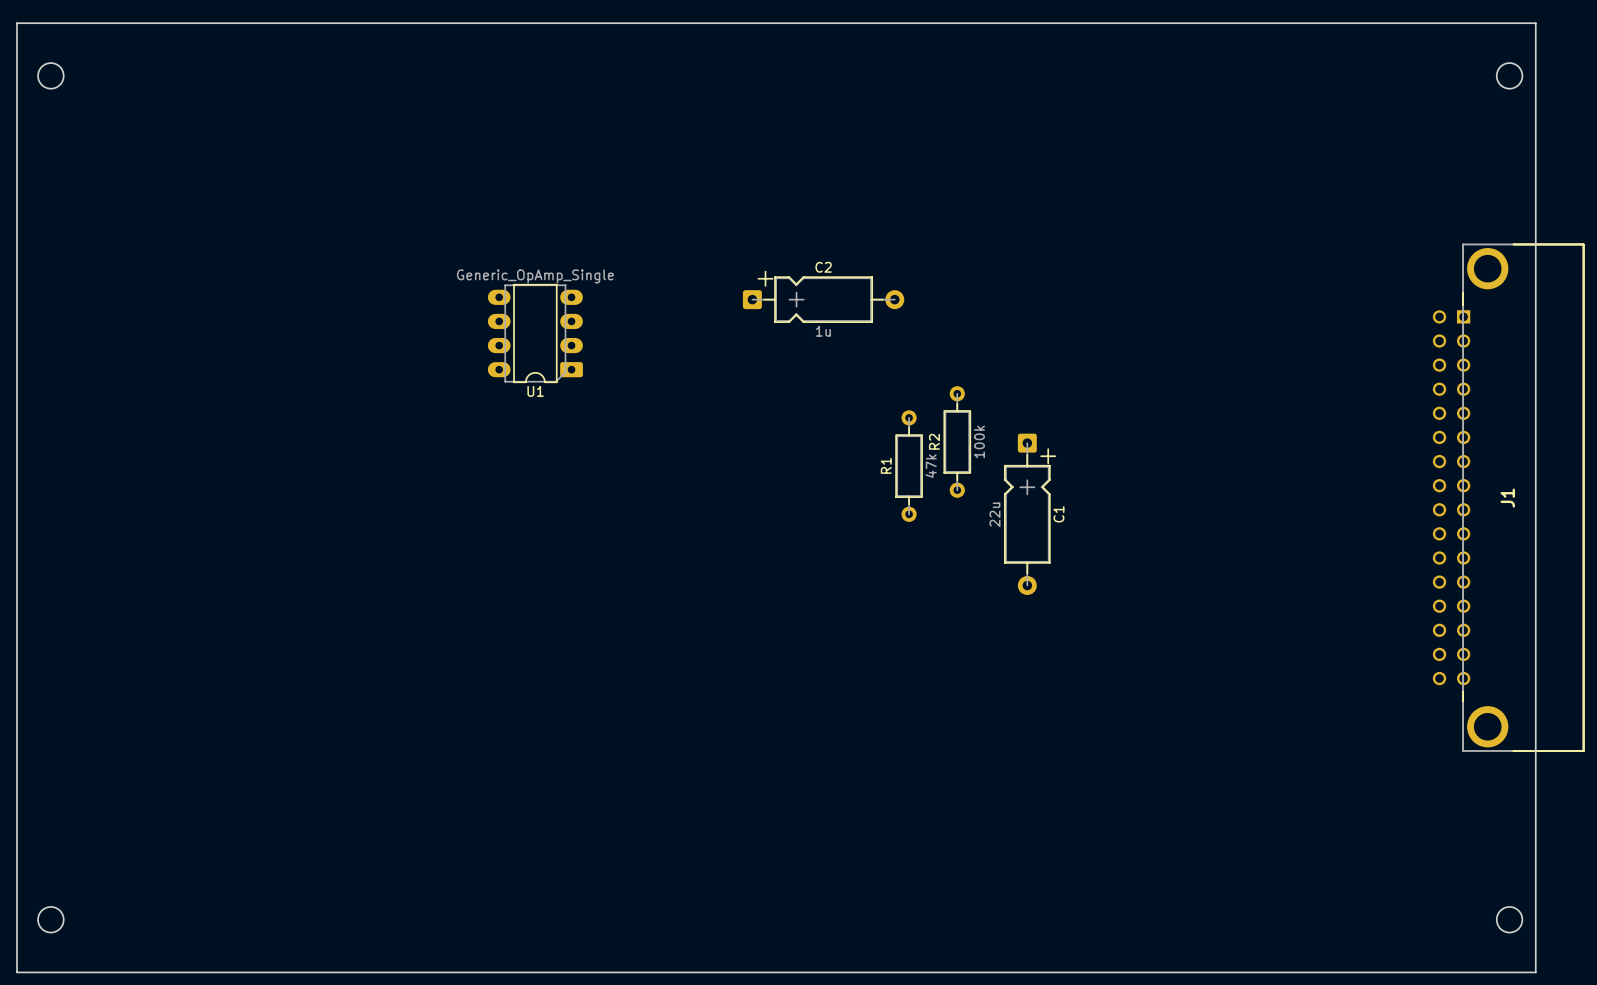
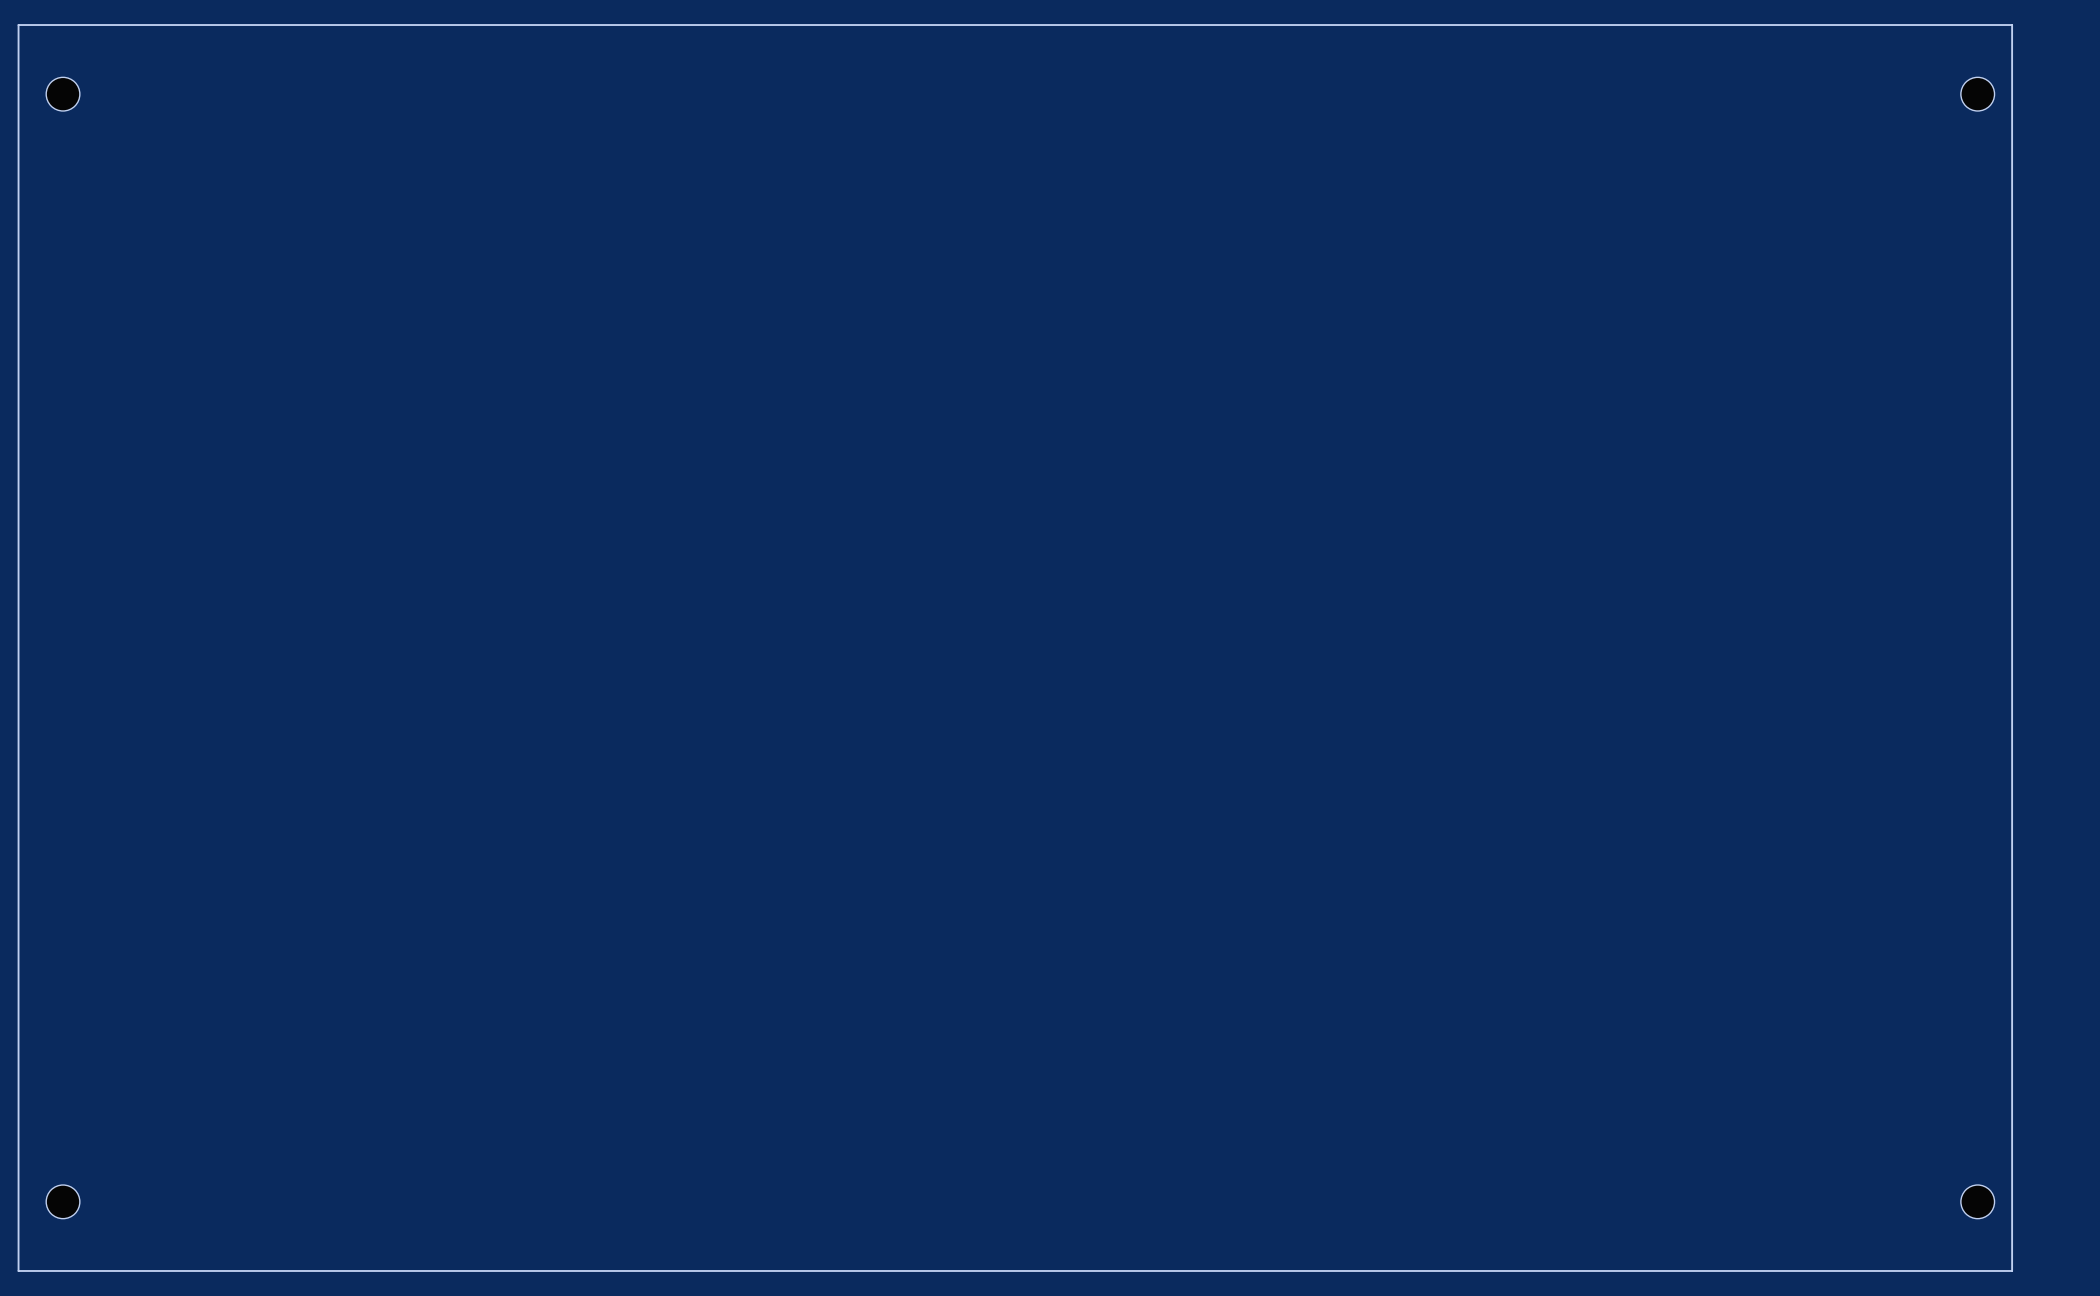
C2: 1u (823, 296) -> none
U1: Generic_OpAmp_Single (535, 333) -> none
R2: 100k (957, 441) -> none
R1: 47k (909, 466) -> none
J1: (1508, 497) -> none
C1: 22u (1030, 514) -> none

